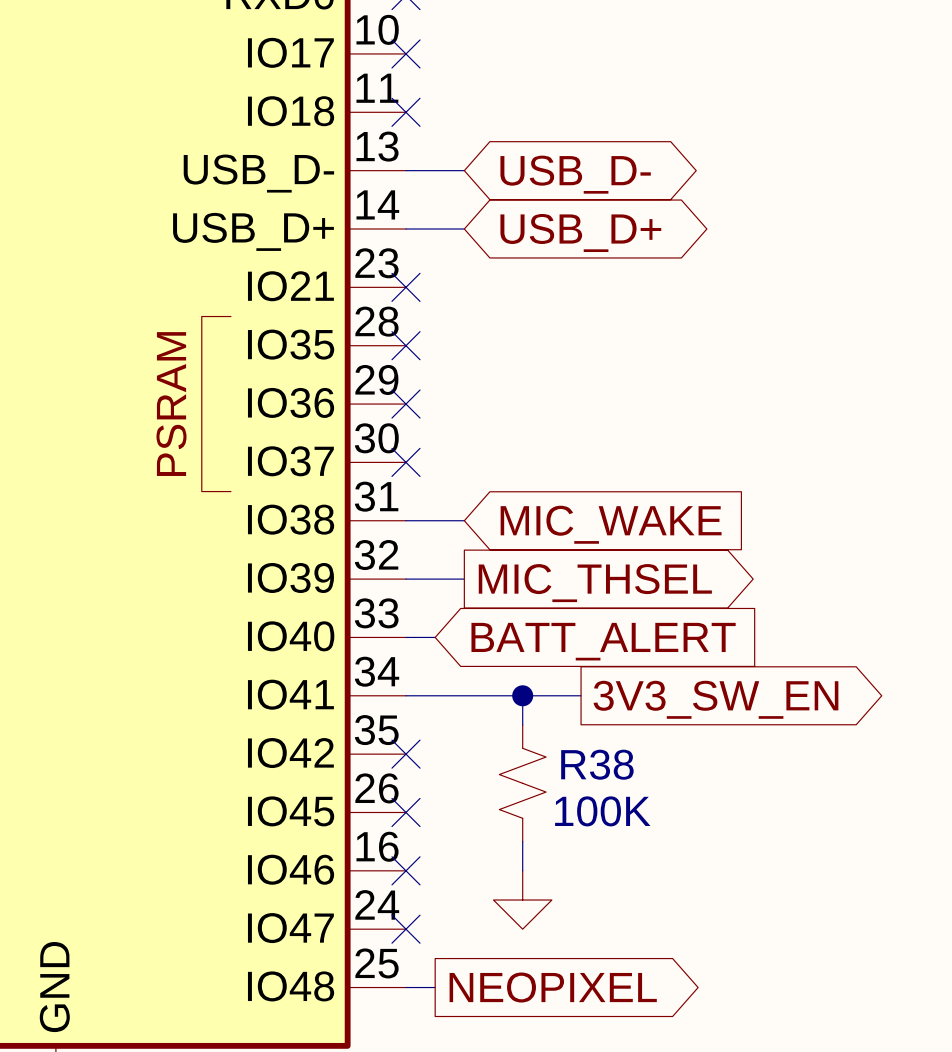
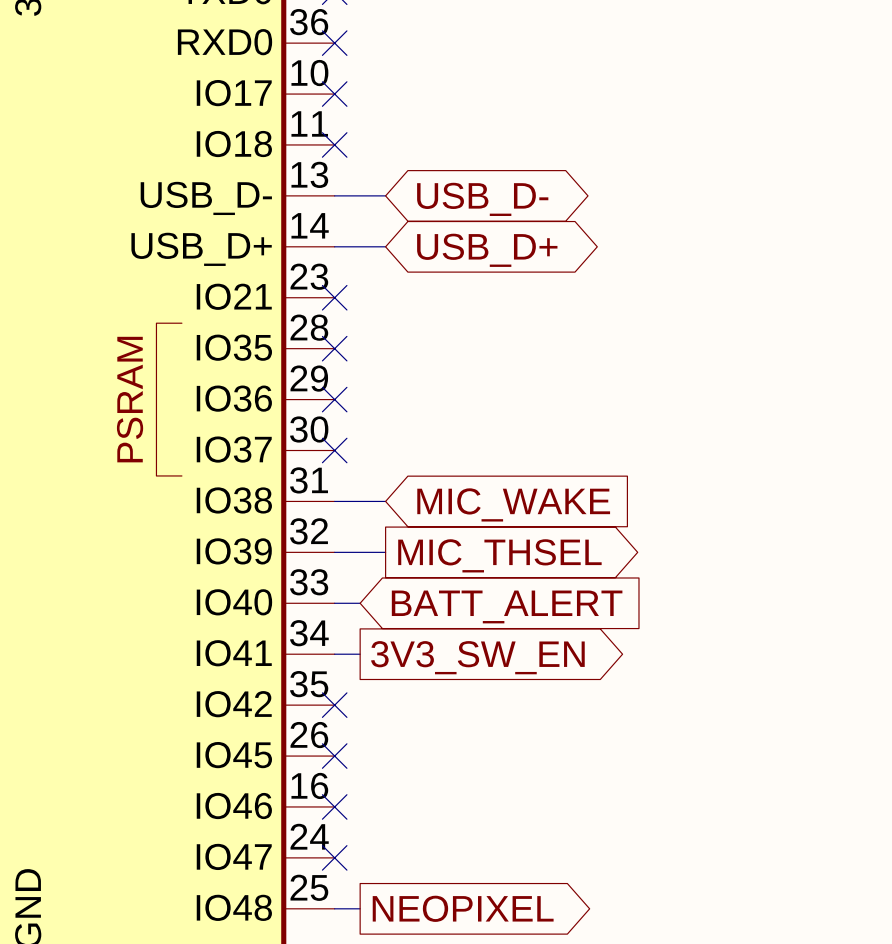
wire: (435, 695) (581, 695) -> none
wire: (522, 695) (522, 724) -> none
junction: (522, 695) -> none
global label position: 3V3_SW_EN (715, 699) -> 3V3_SW_EN (477, 657)
R38: 100K (522, 783) -> none
wire: (522, 841) (522, 870) -> none
power symbol: (522, 900) -> none

